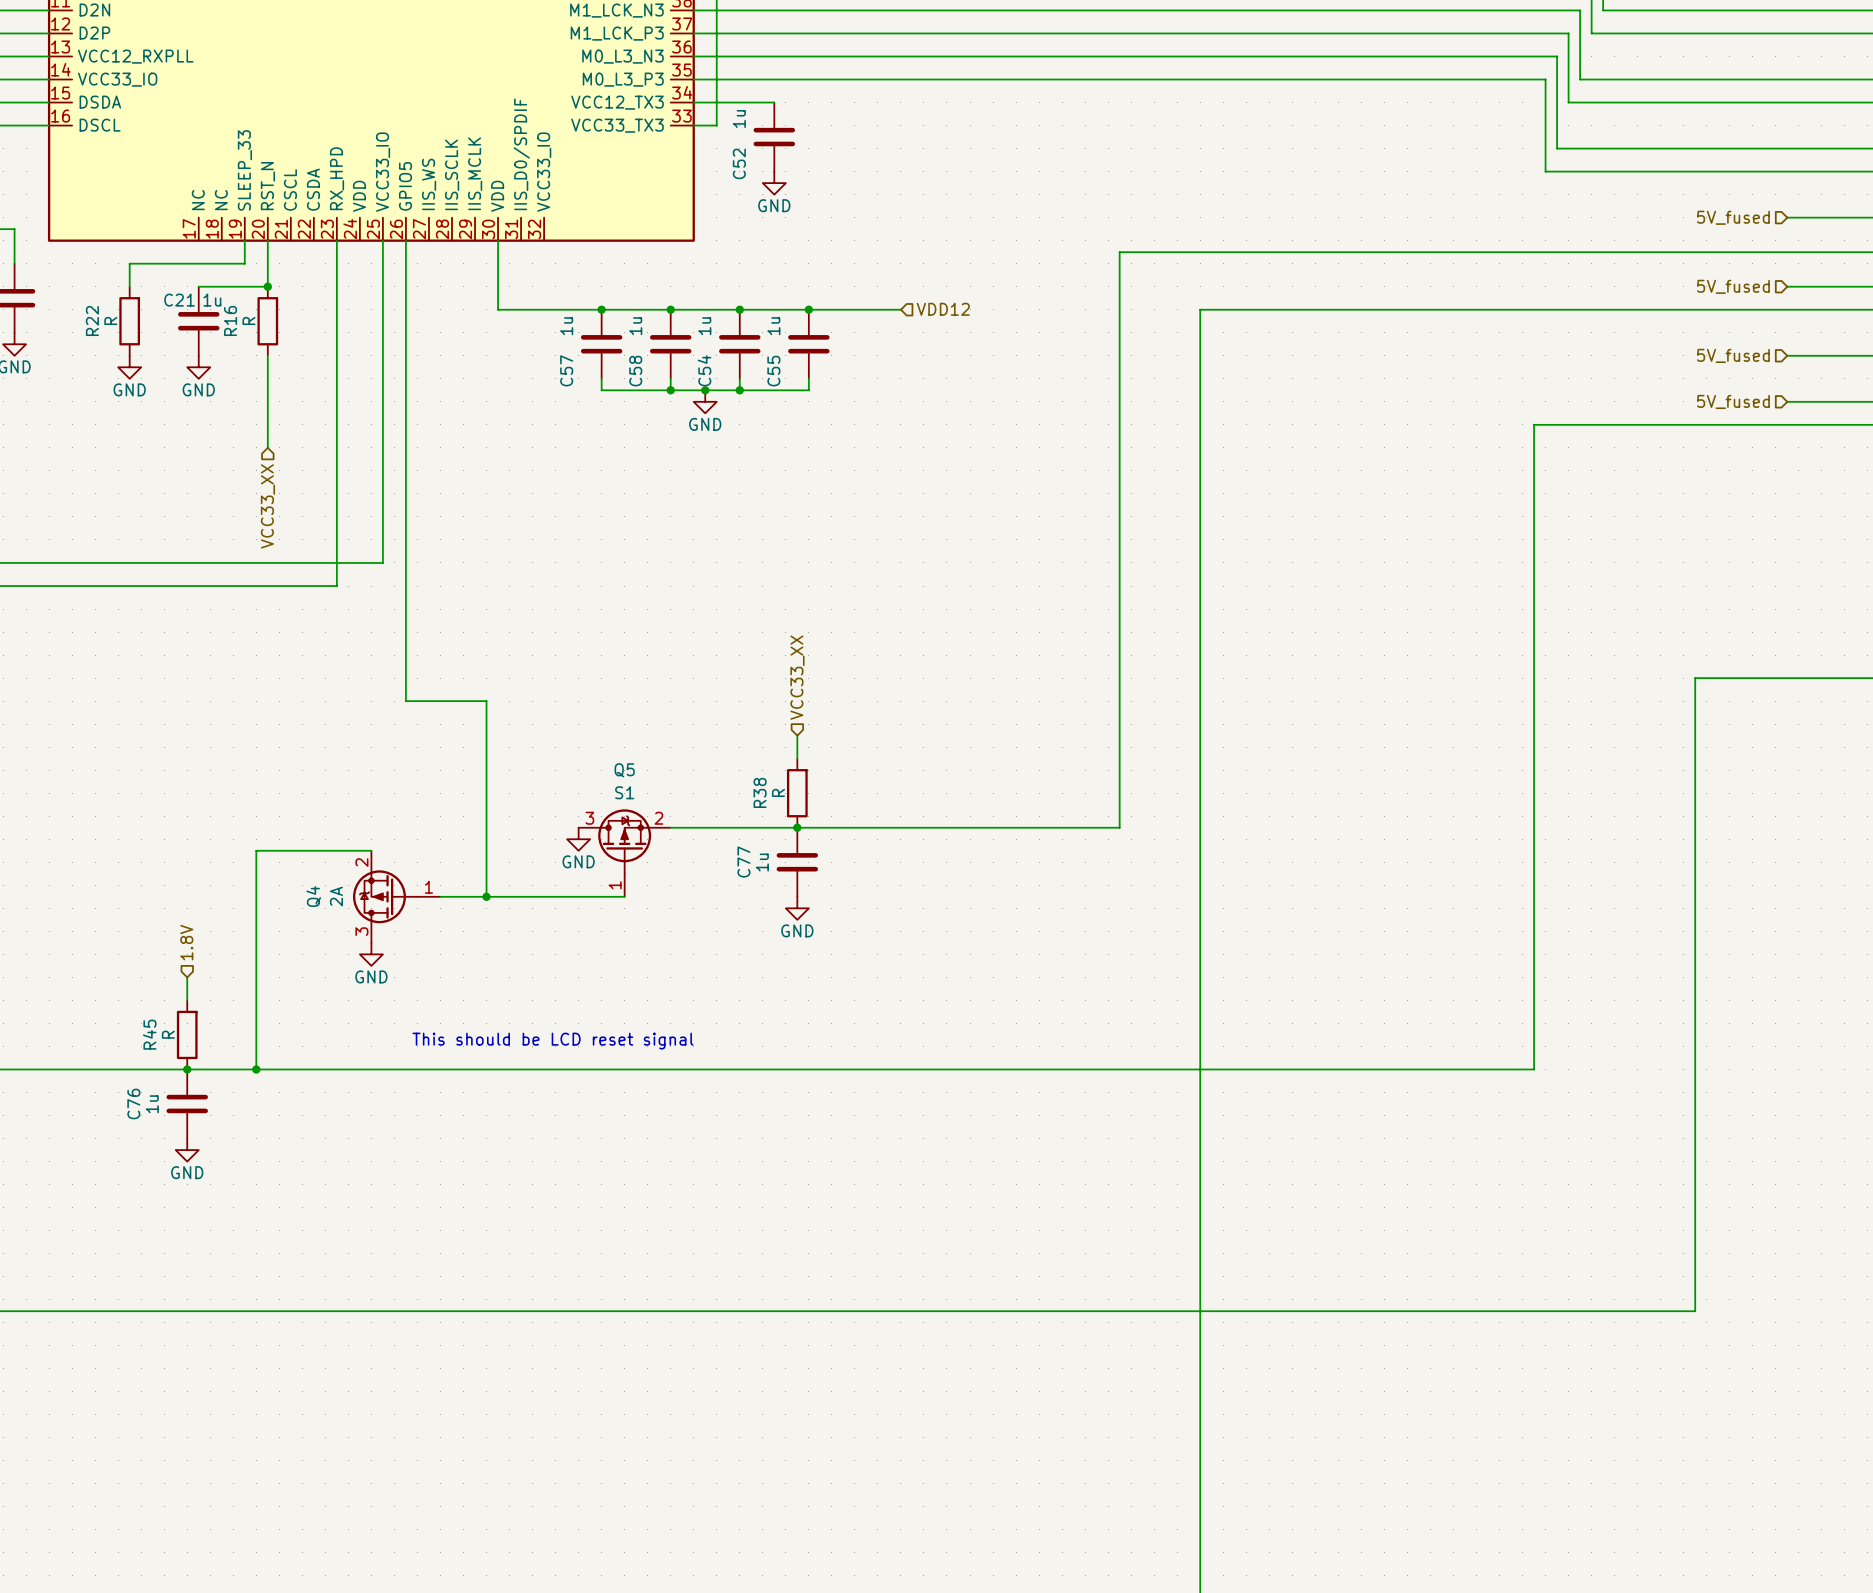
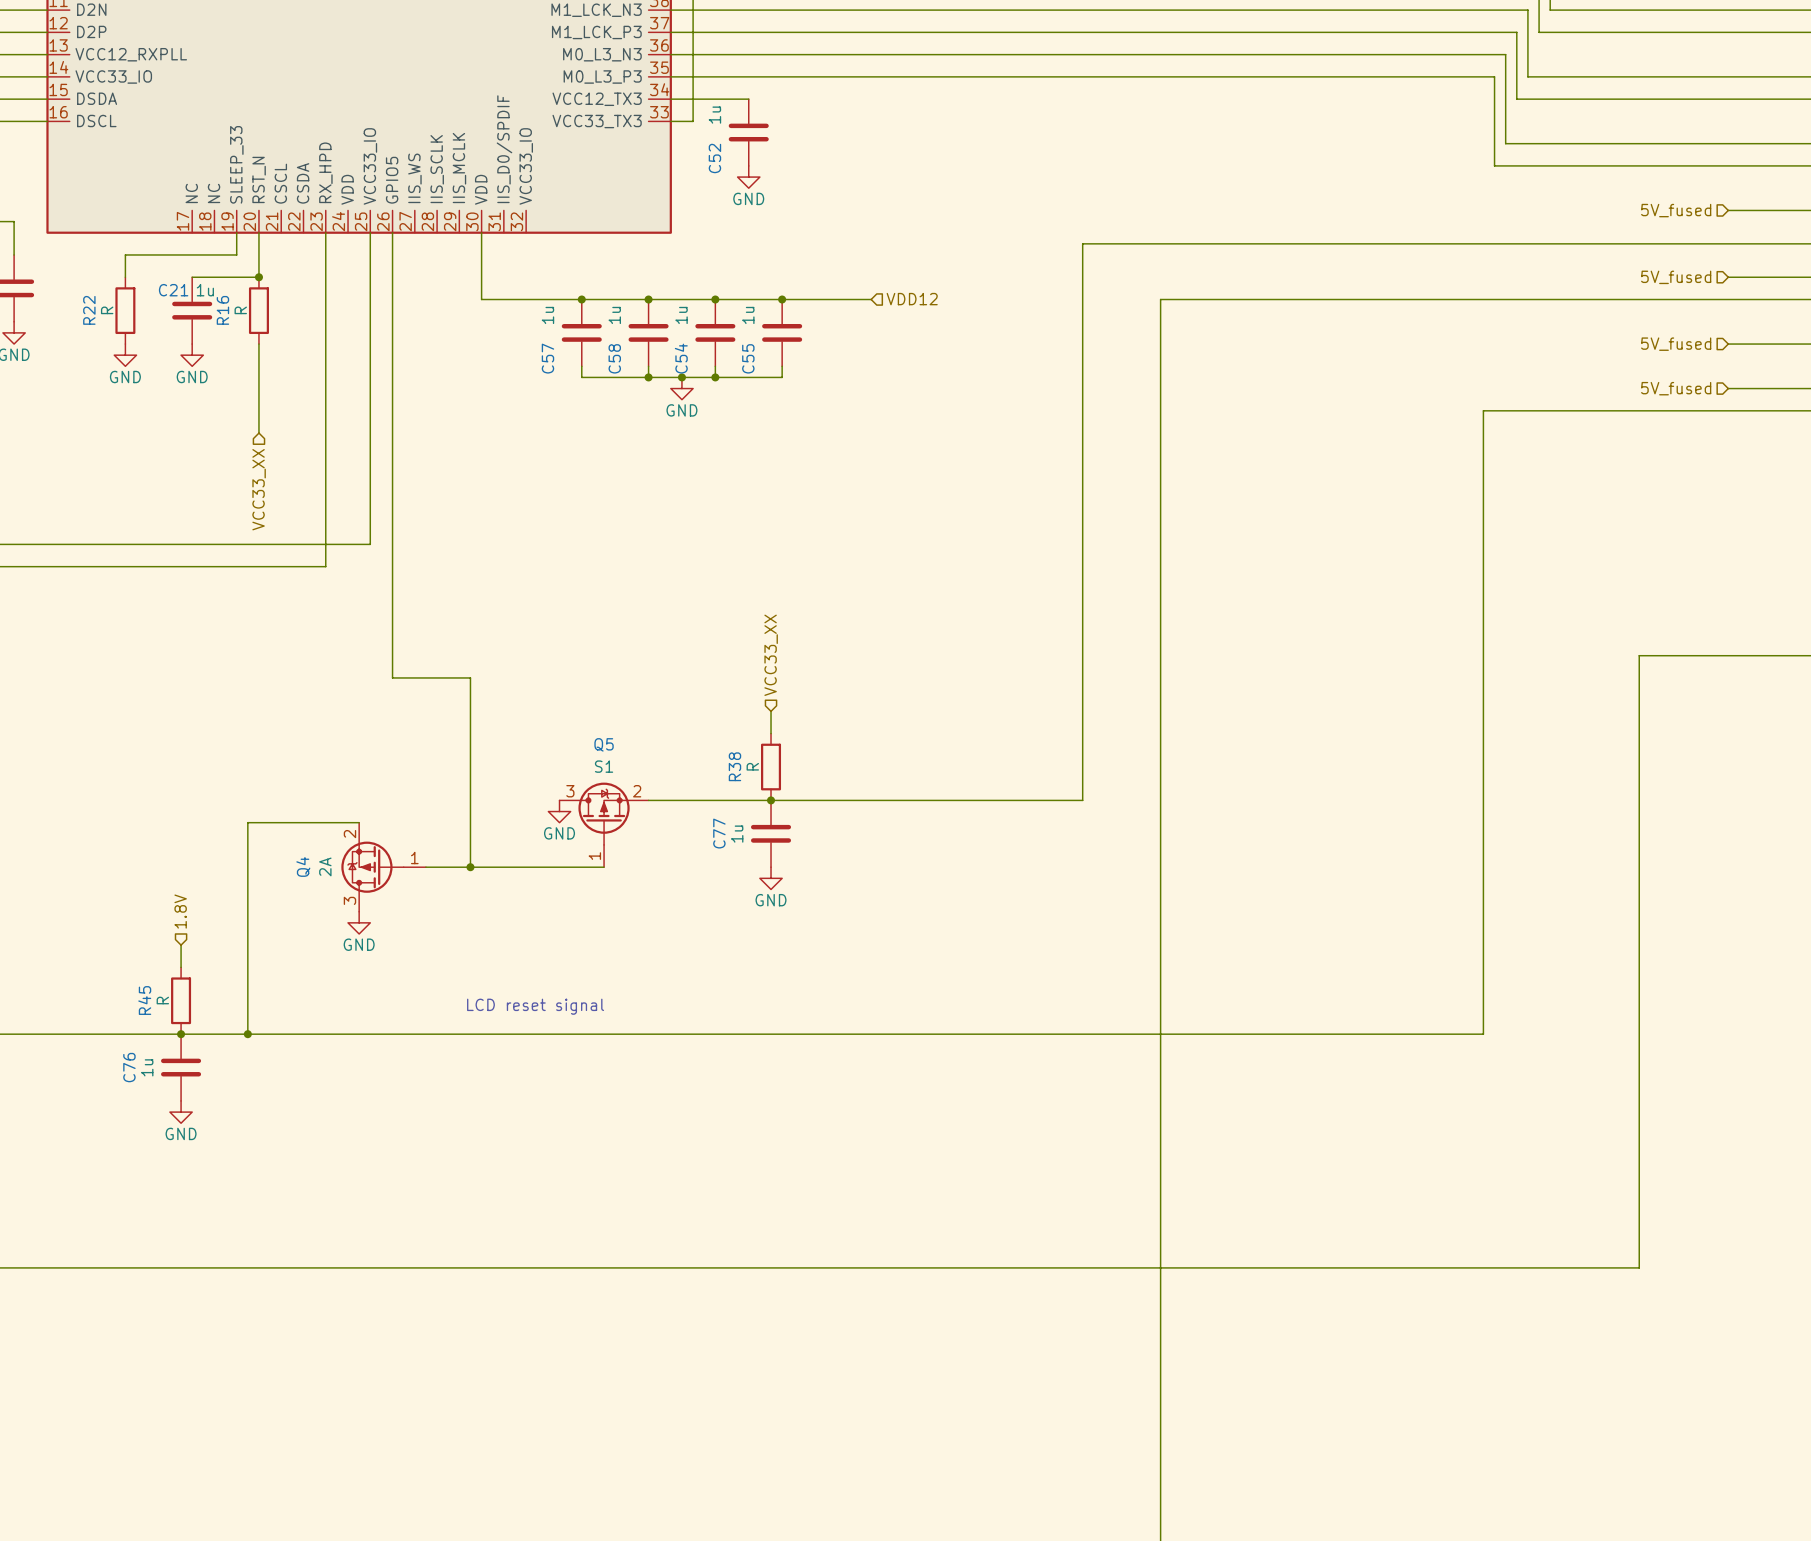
text: This should be LCD reset signal (553, 1041) -> LCD reset signal (535, 1006)

